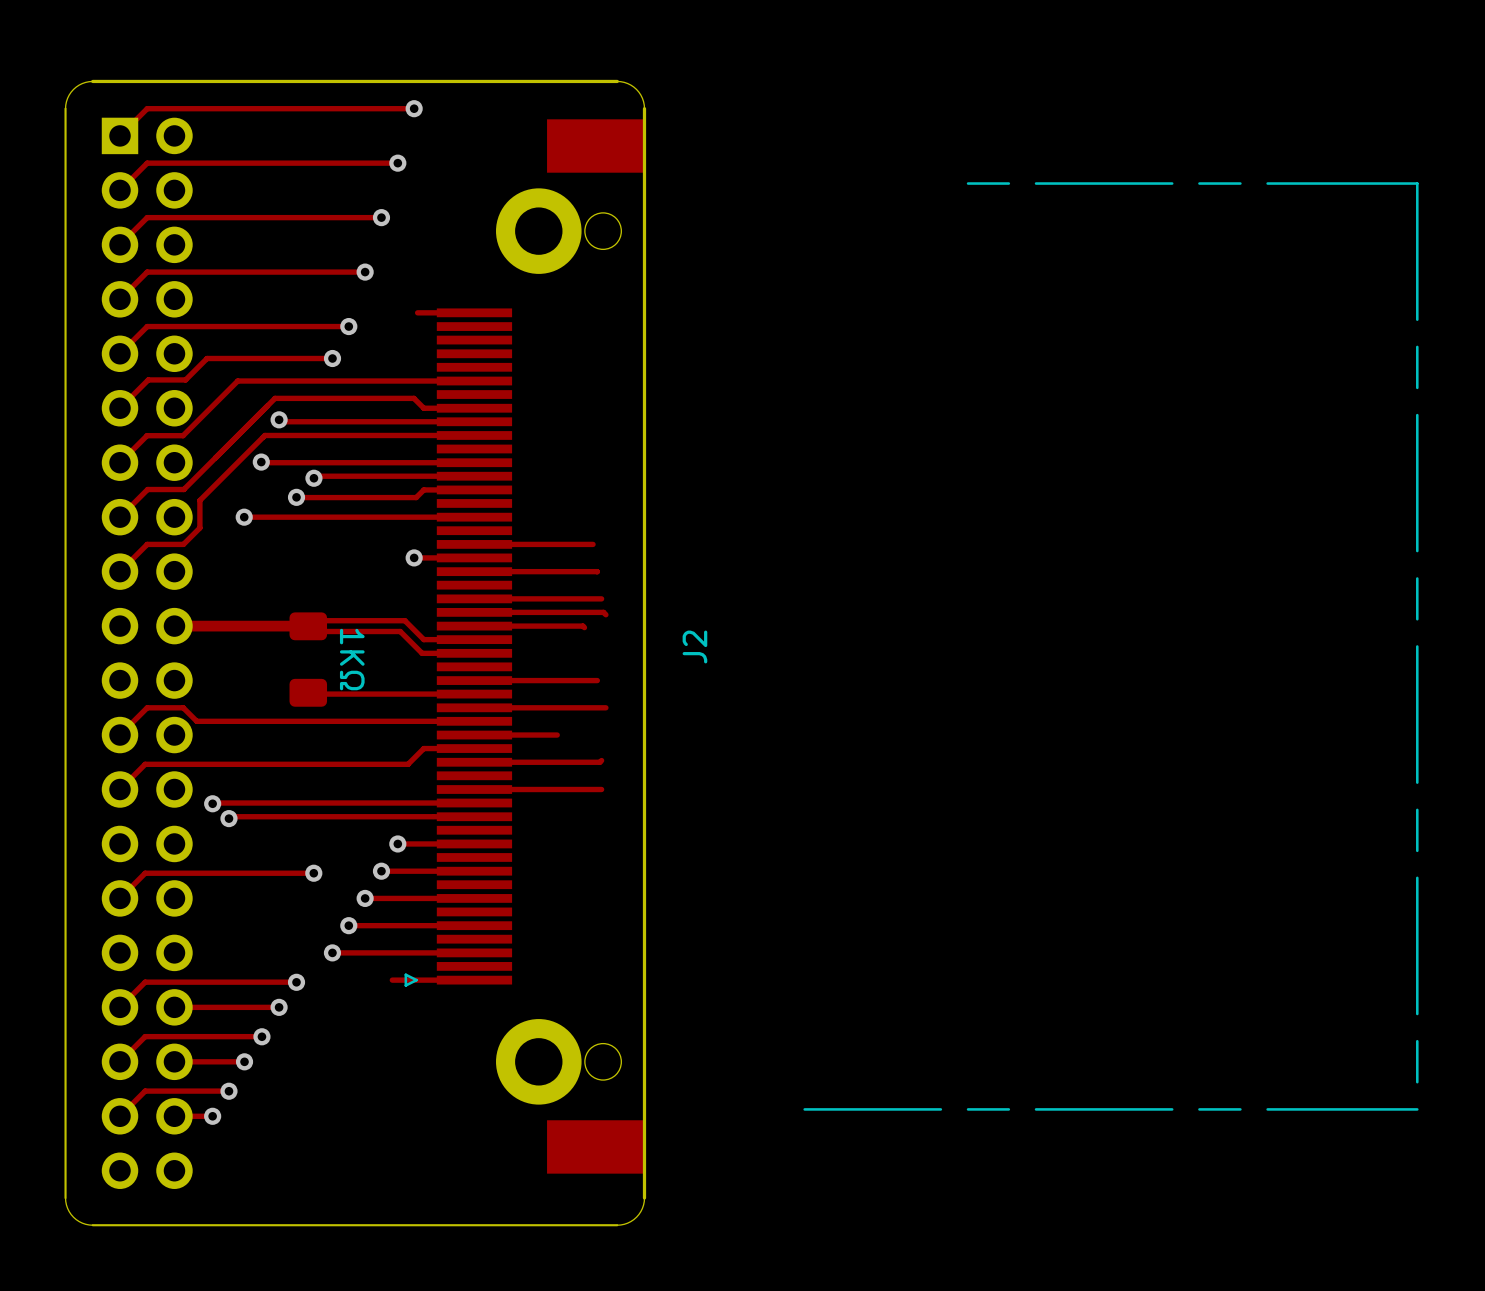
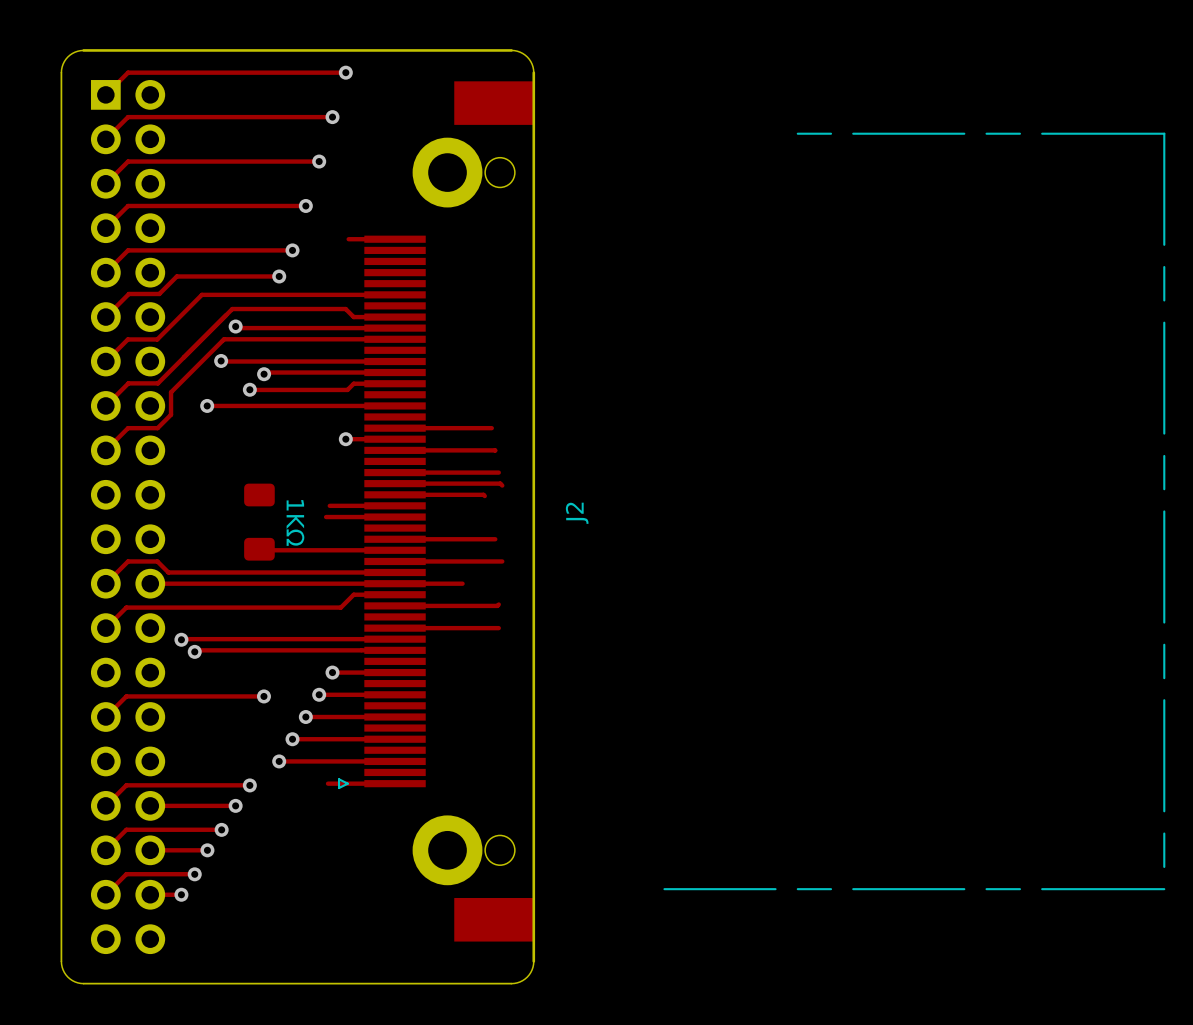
track: (314, 620) (404, 620) (423, 639) -> (329, 505) (353, 505)
track: (174, 626) (308, 626) -> none
track: (311, 631) (400, 631) (422, 653) -> (326, 517) (352, 517)
track: none -> (150, 583) (395, 583)

